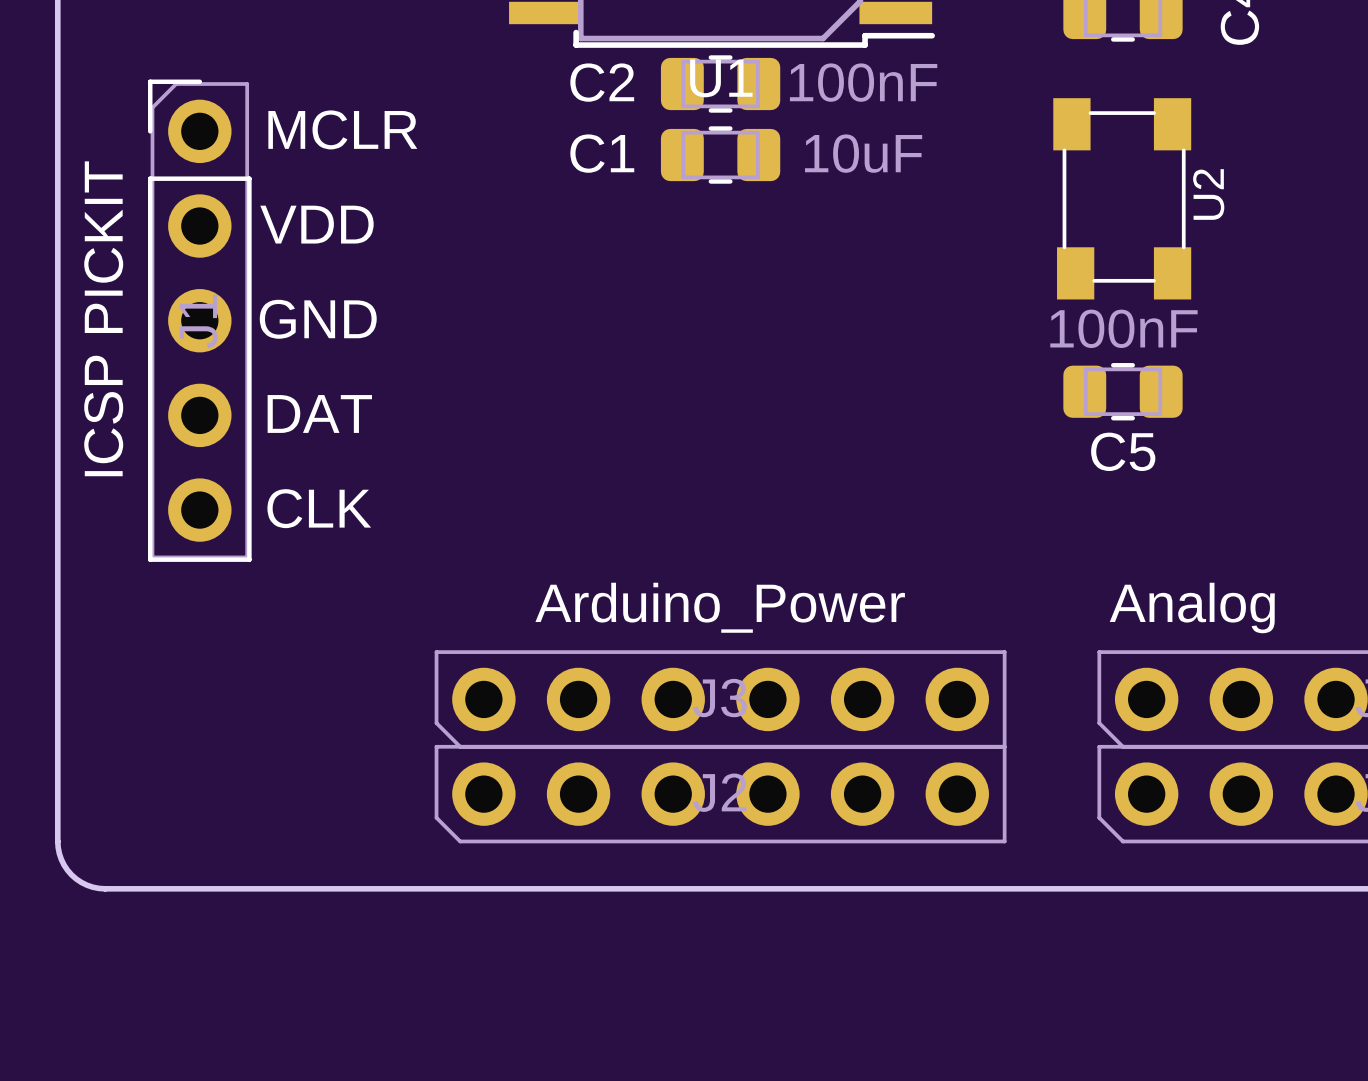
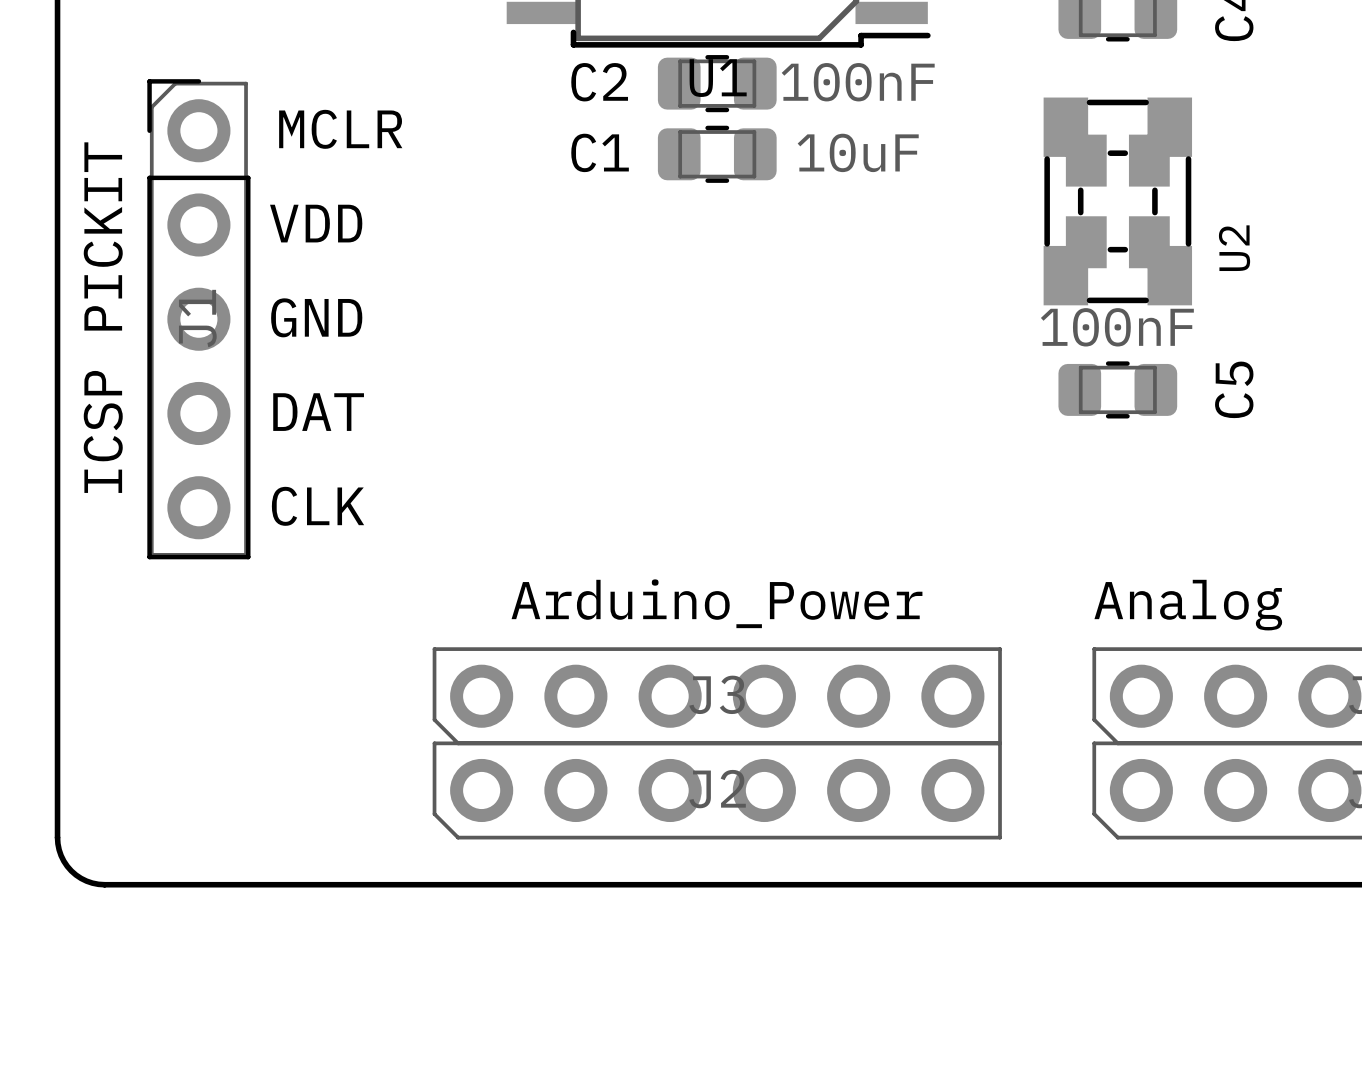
U2 footprint: [1053, 98, 1192, 300] -> [1043, 97, 1193, 306]
C5 name rotation: 0° (1123, 451) -> 90° counterclockwise (1234, 389)
C5 name position: C5 (1123, 451) -> C5 (1234, 389)

